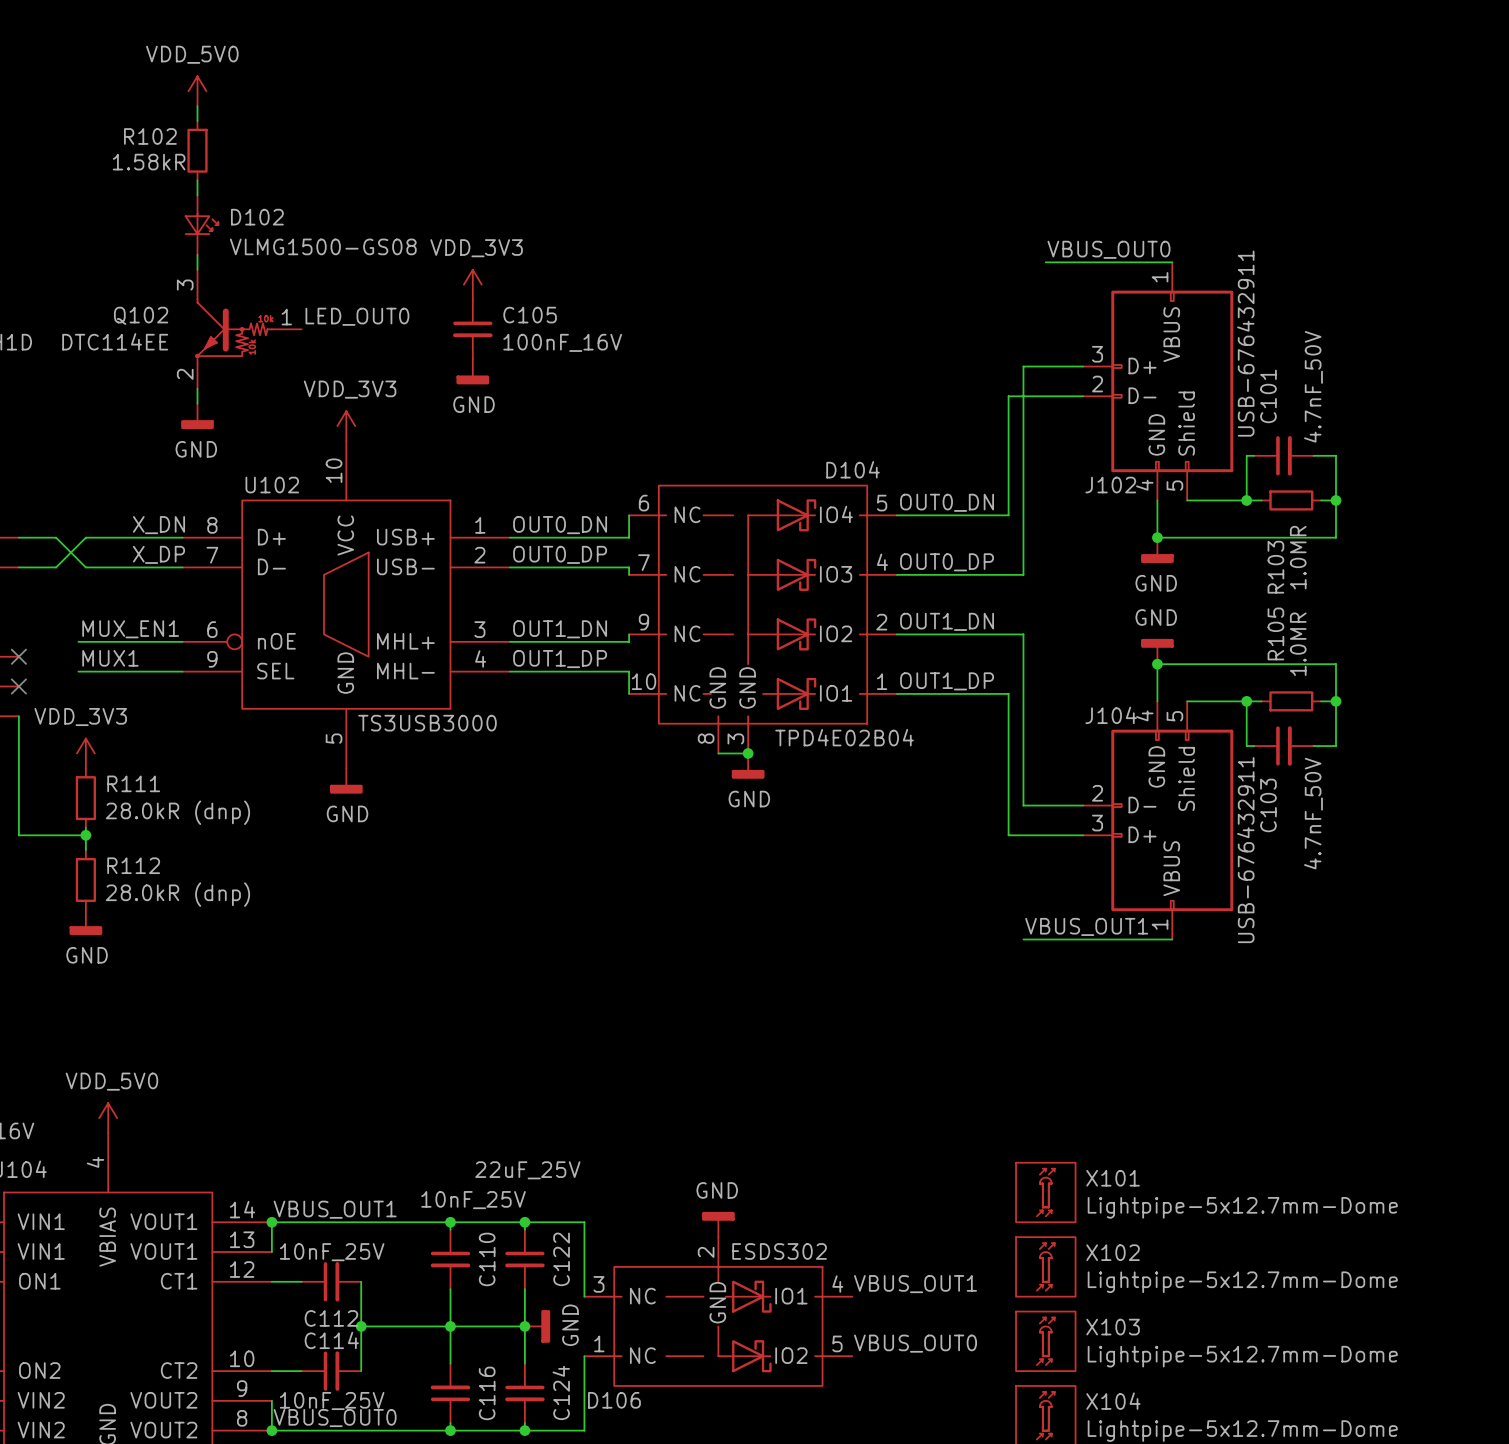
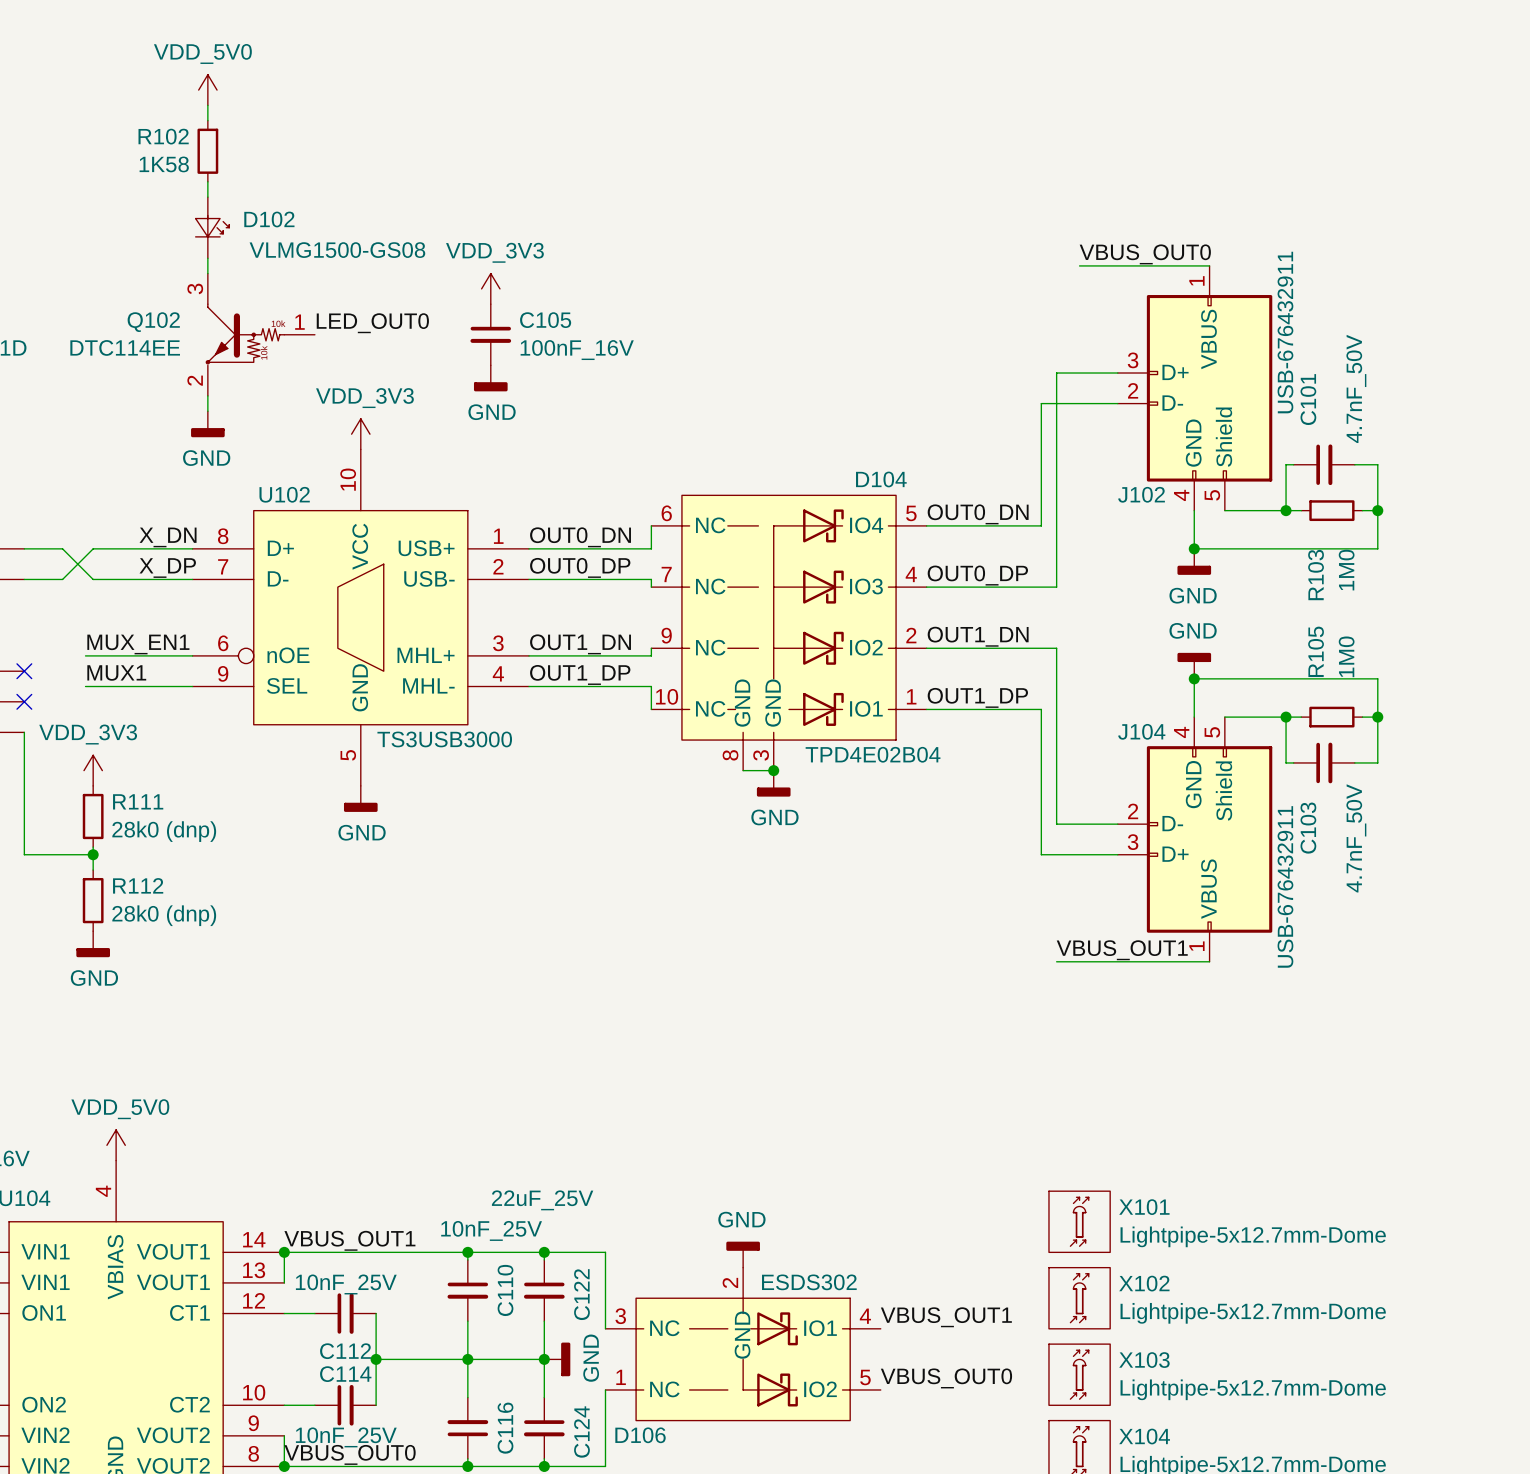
R102 value: 1.58kR (149, 162) -> 1K58 (164, 164)
R103 value: 1.0MR (1298, 557) -> 1M0 (1346, 570)
R105 value: 1.0MR (1298, 644) -> 1M0 (1346, 656)
R111 value: 28.0kR (dnp) (177, 812) -> 28k0 (dnp) (164, 831)
R112 value: 28.0kR (dnp) (177, 894) -> 28k0 (dnp) (164, 915)

